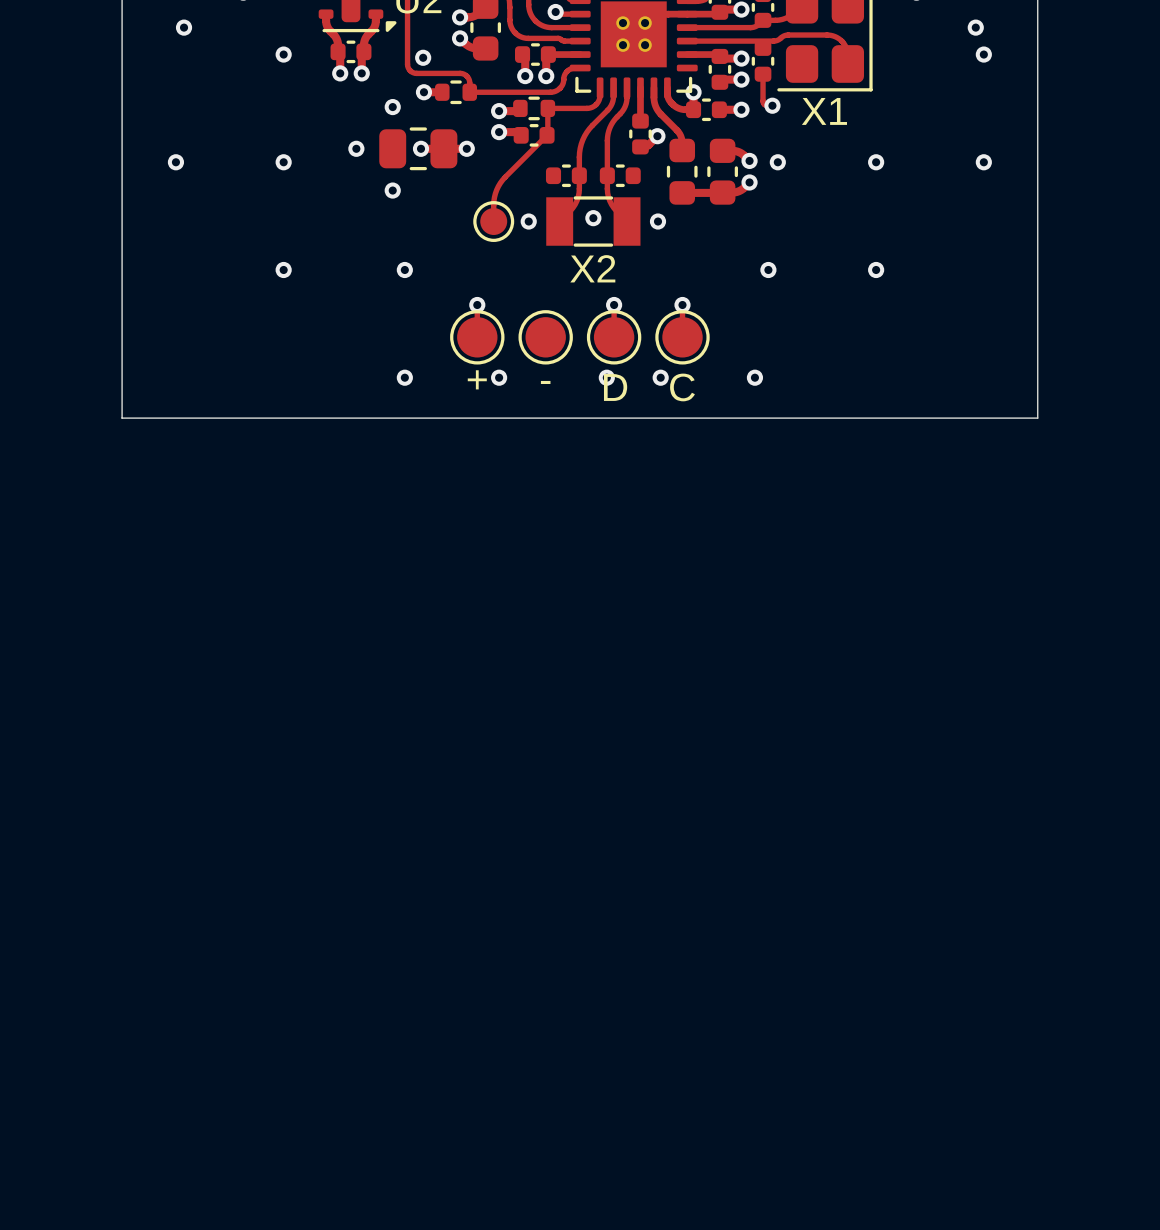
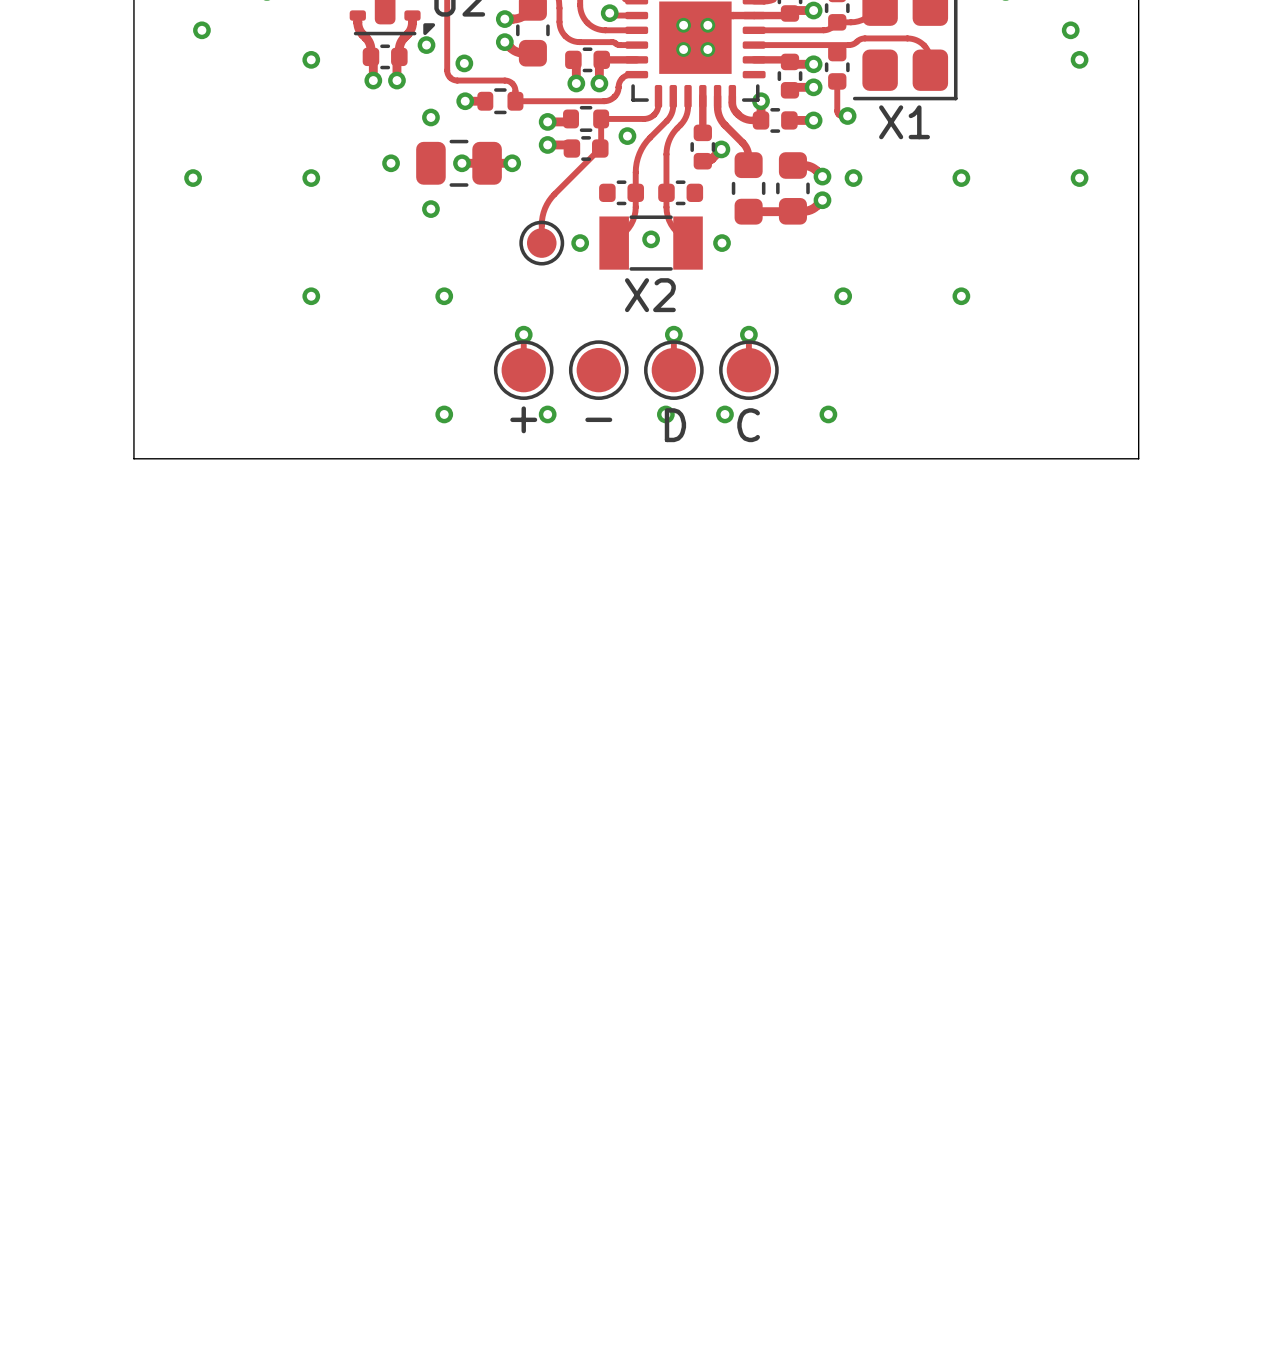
via: none -> (426, 45)
via: none -> (627, 136)

